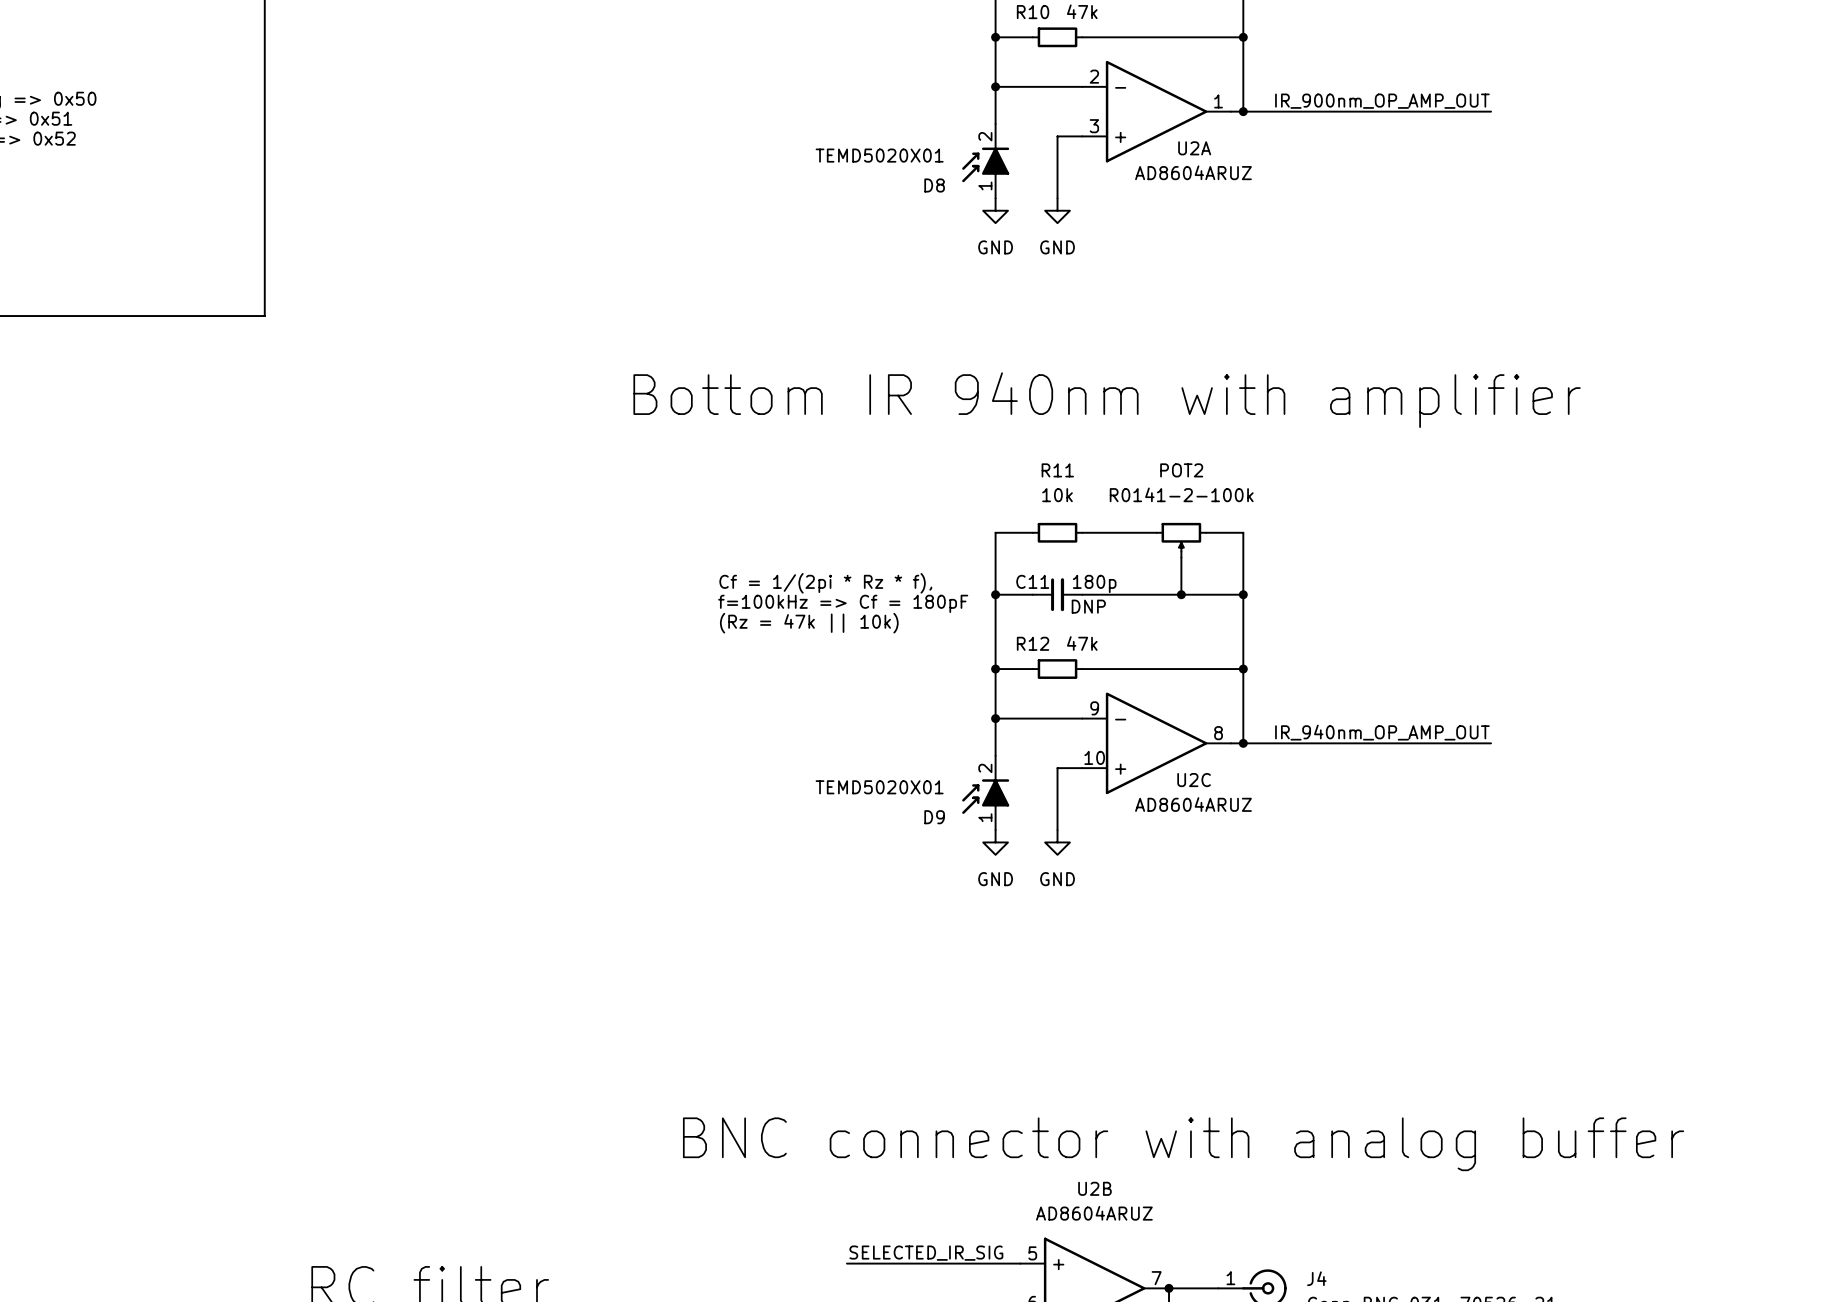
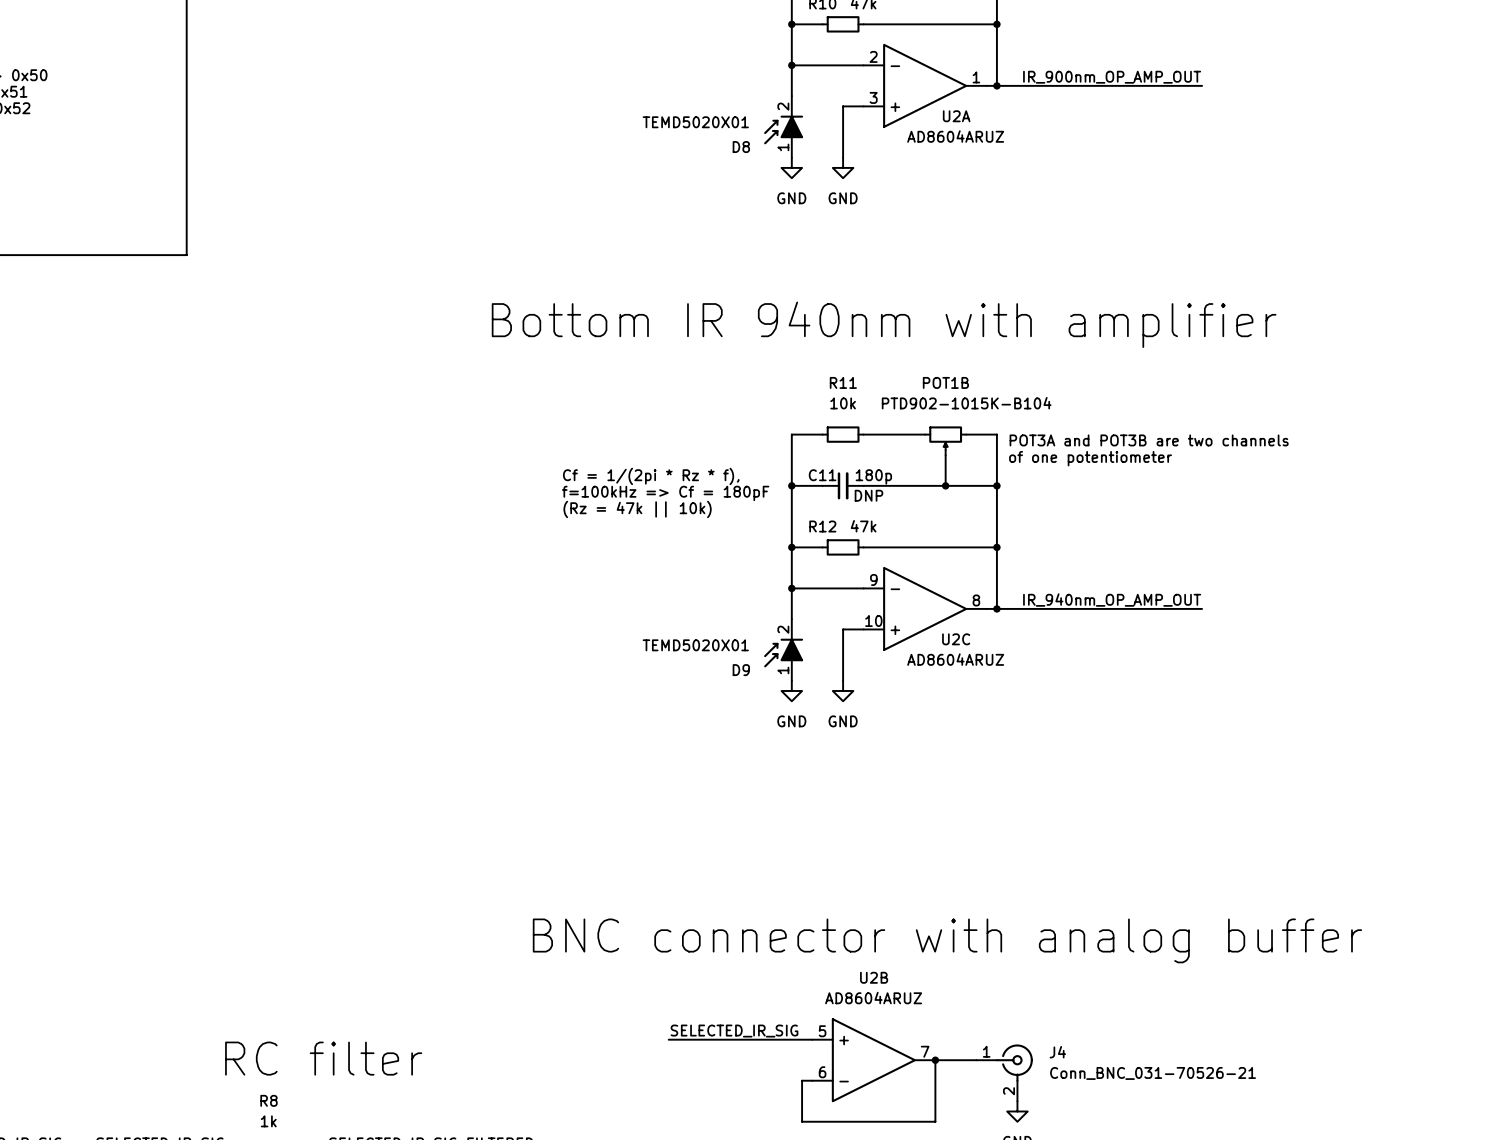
POT2 name: POT2 (1181, 470) -> POT1B (945, 382)
POT2 text: R0141-2-100k (1181, 494) -> none
POT2 value: none -> PTD902-1015K-B104 (966, 403)
text: none -> POT3A and POT3B are two channels (1149, 440)
text: none -> of one potentiometer (1090, 458)

